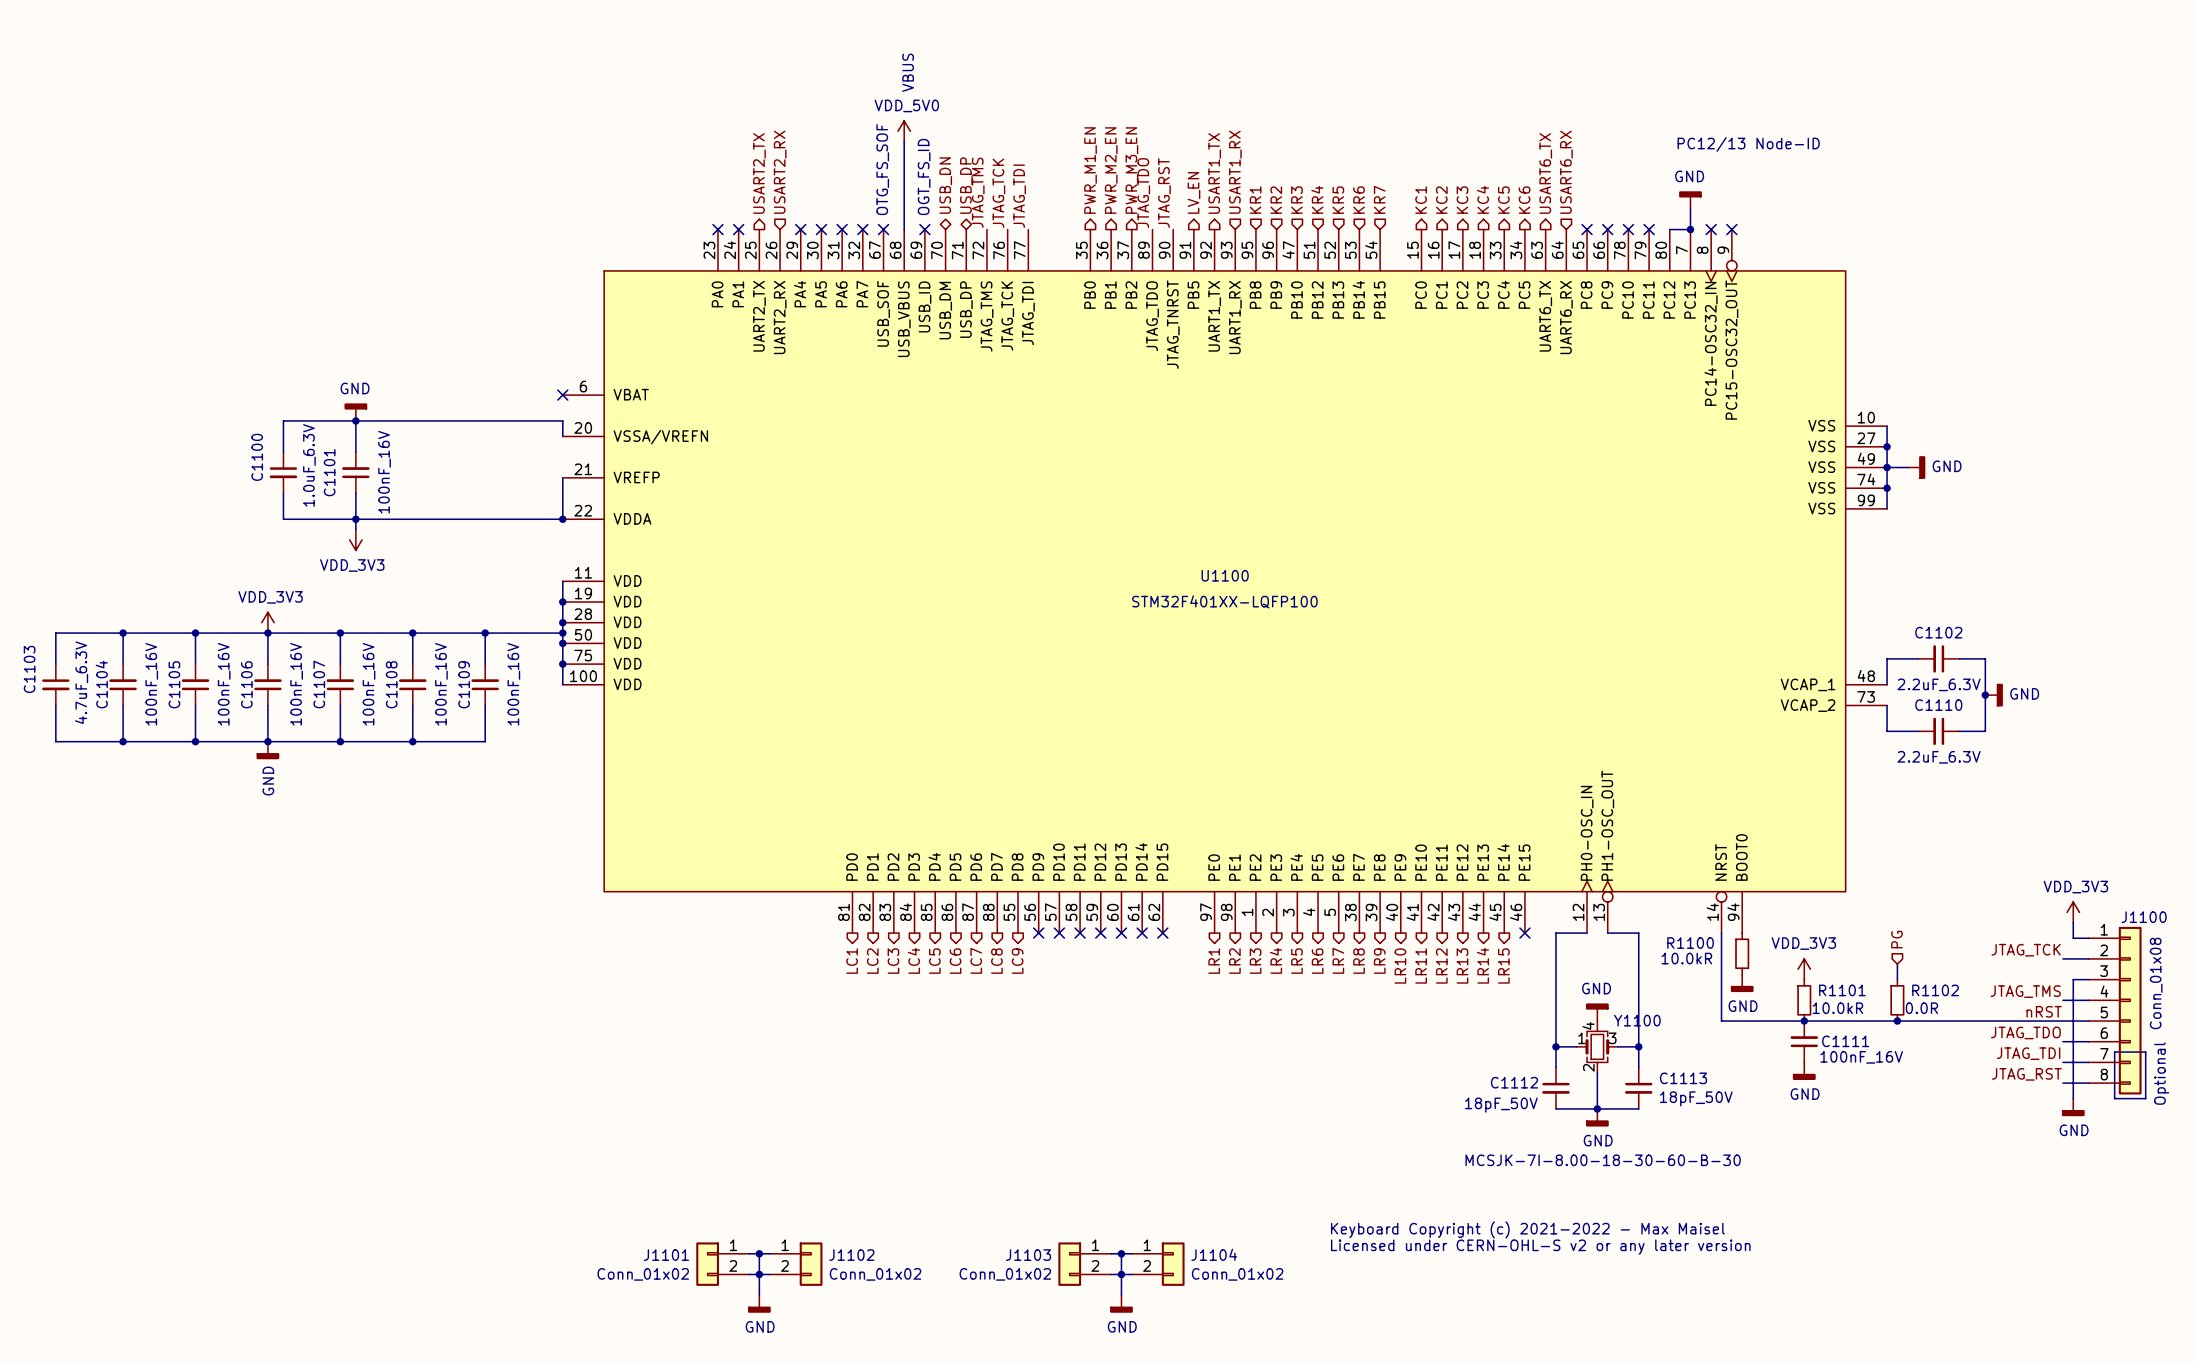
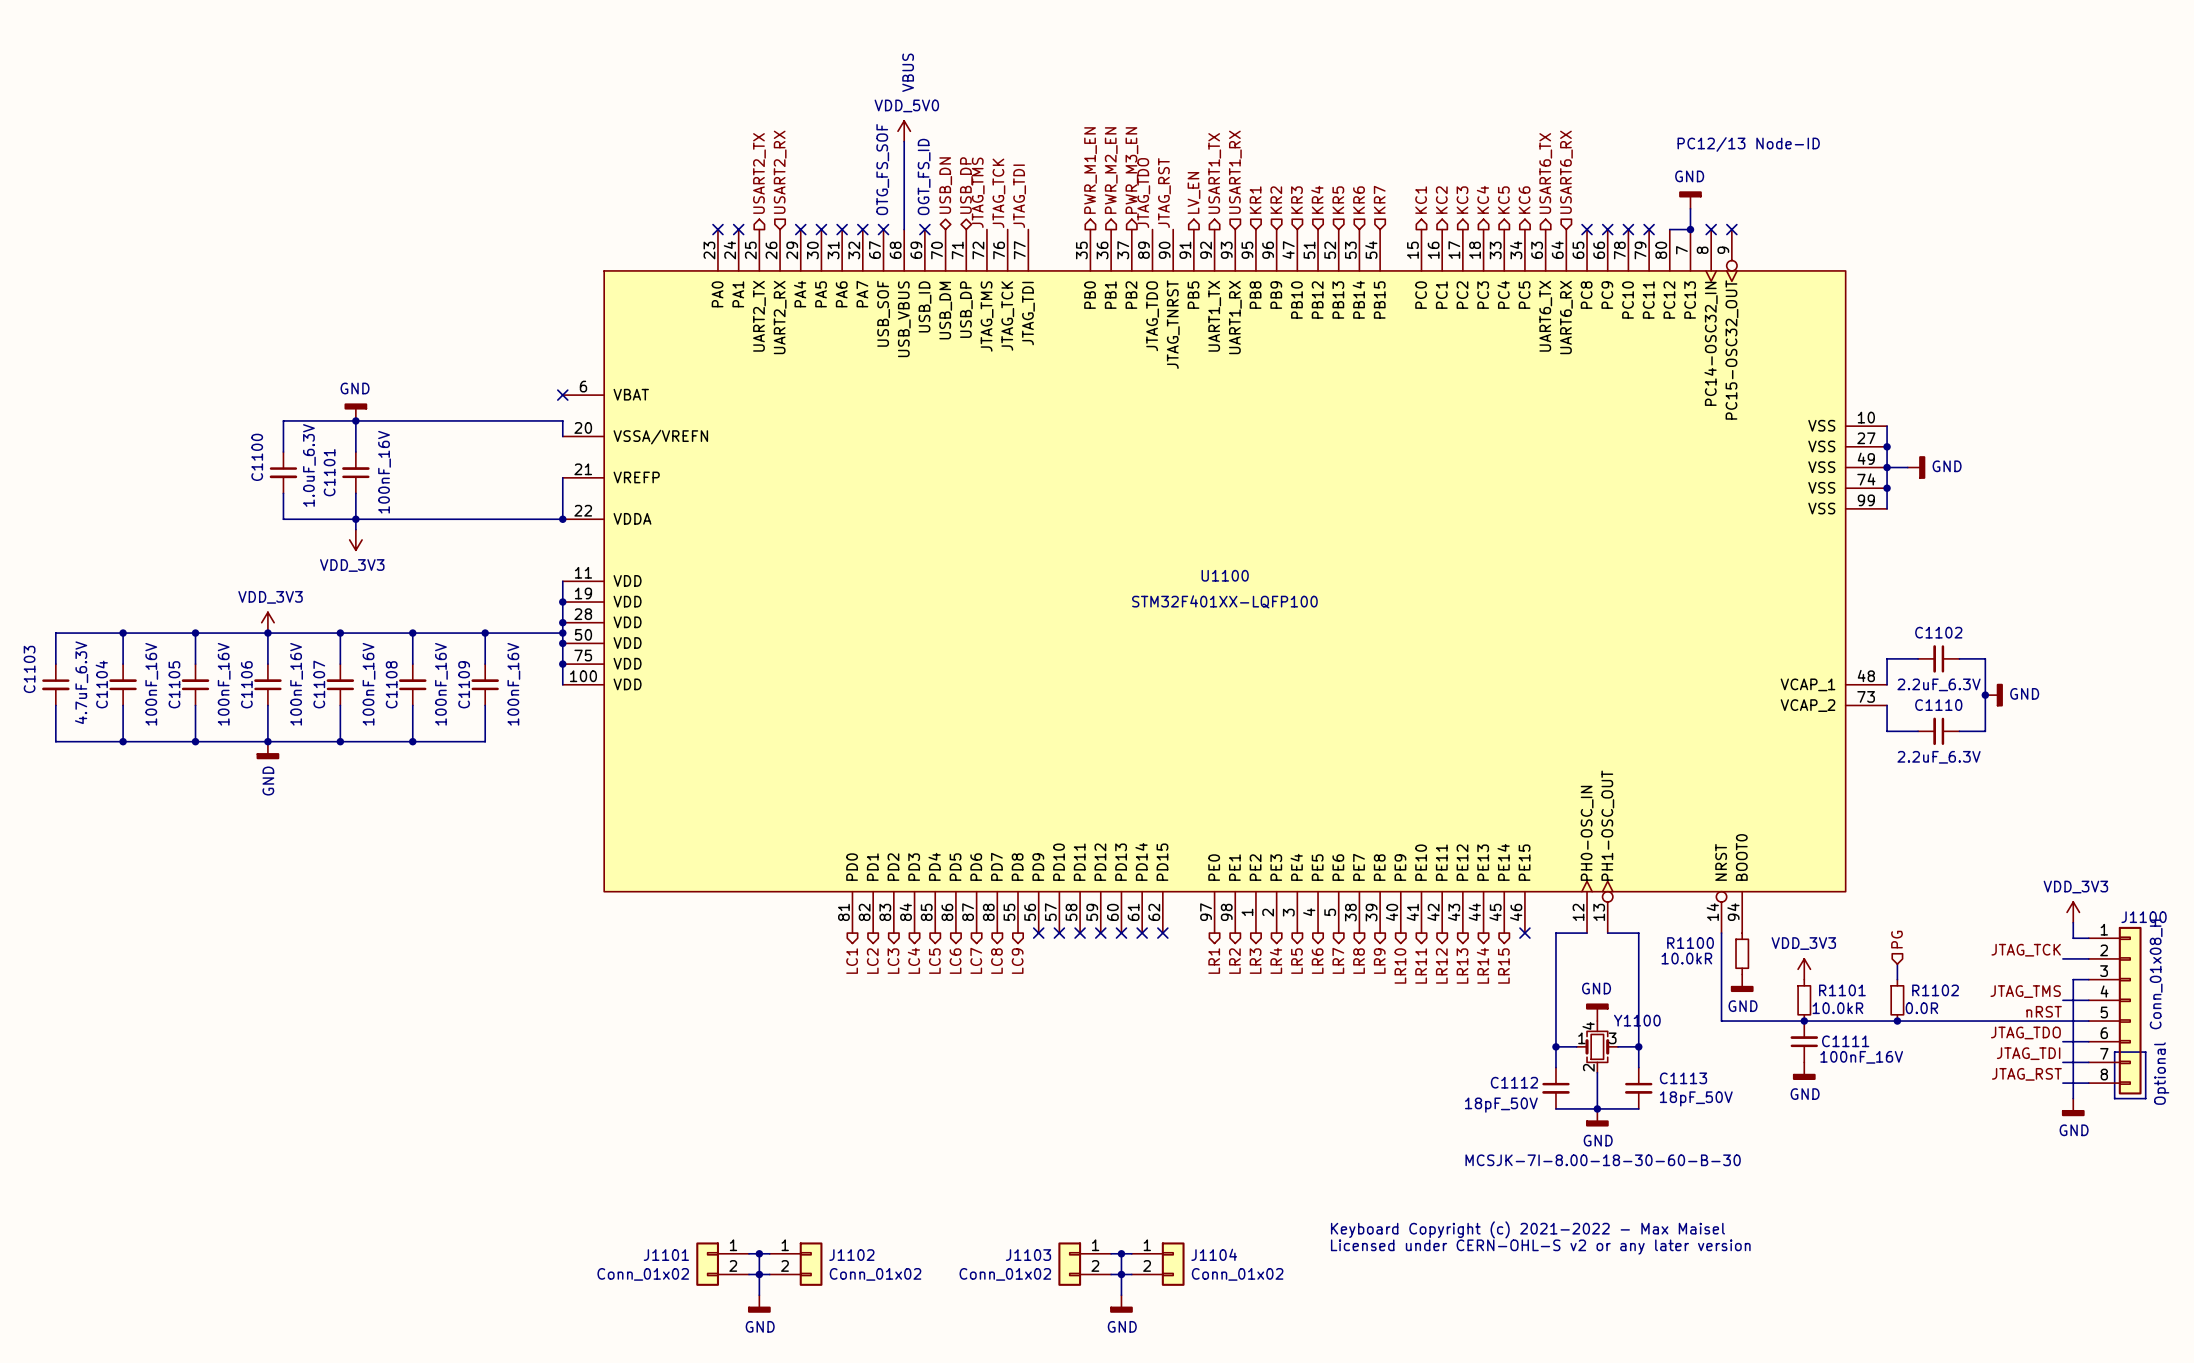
J1100 value: Conn_01x08 (2156, 983) -> Conn_01x08_H (2156, 974)

